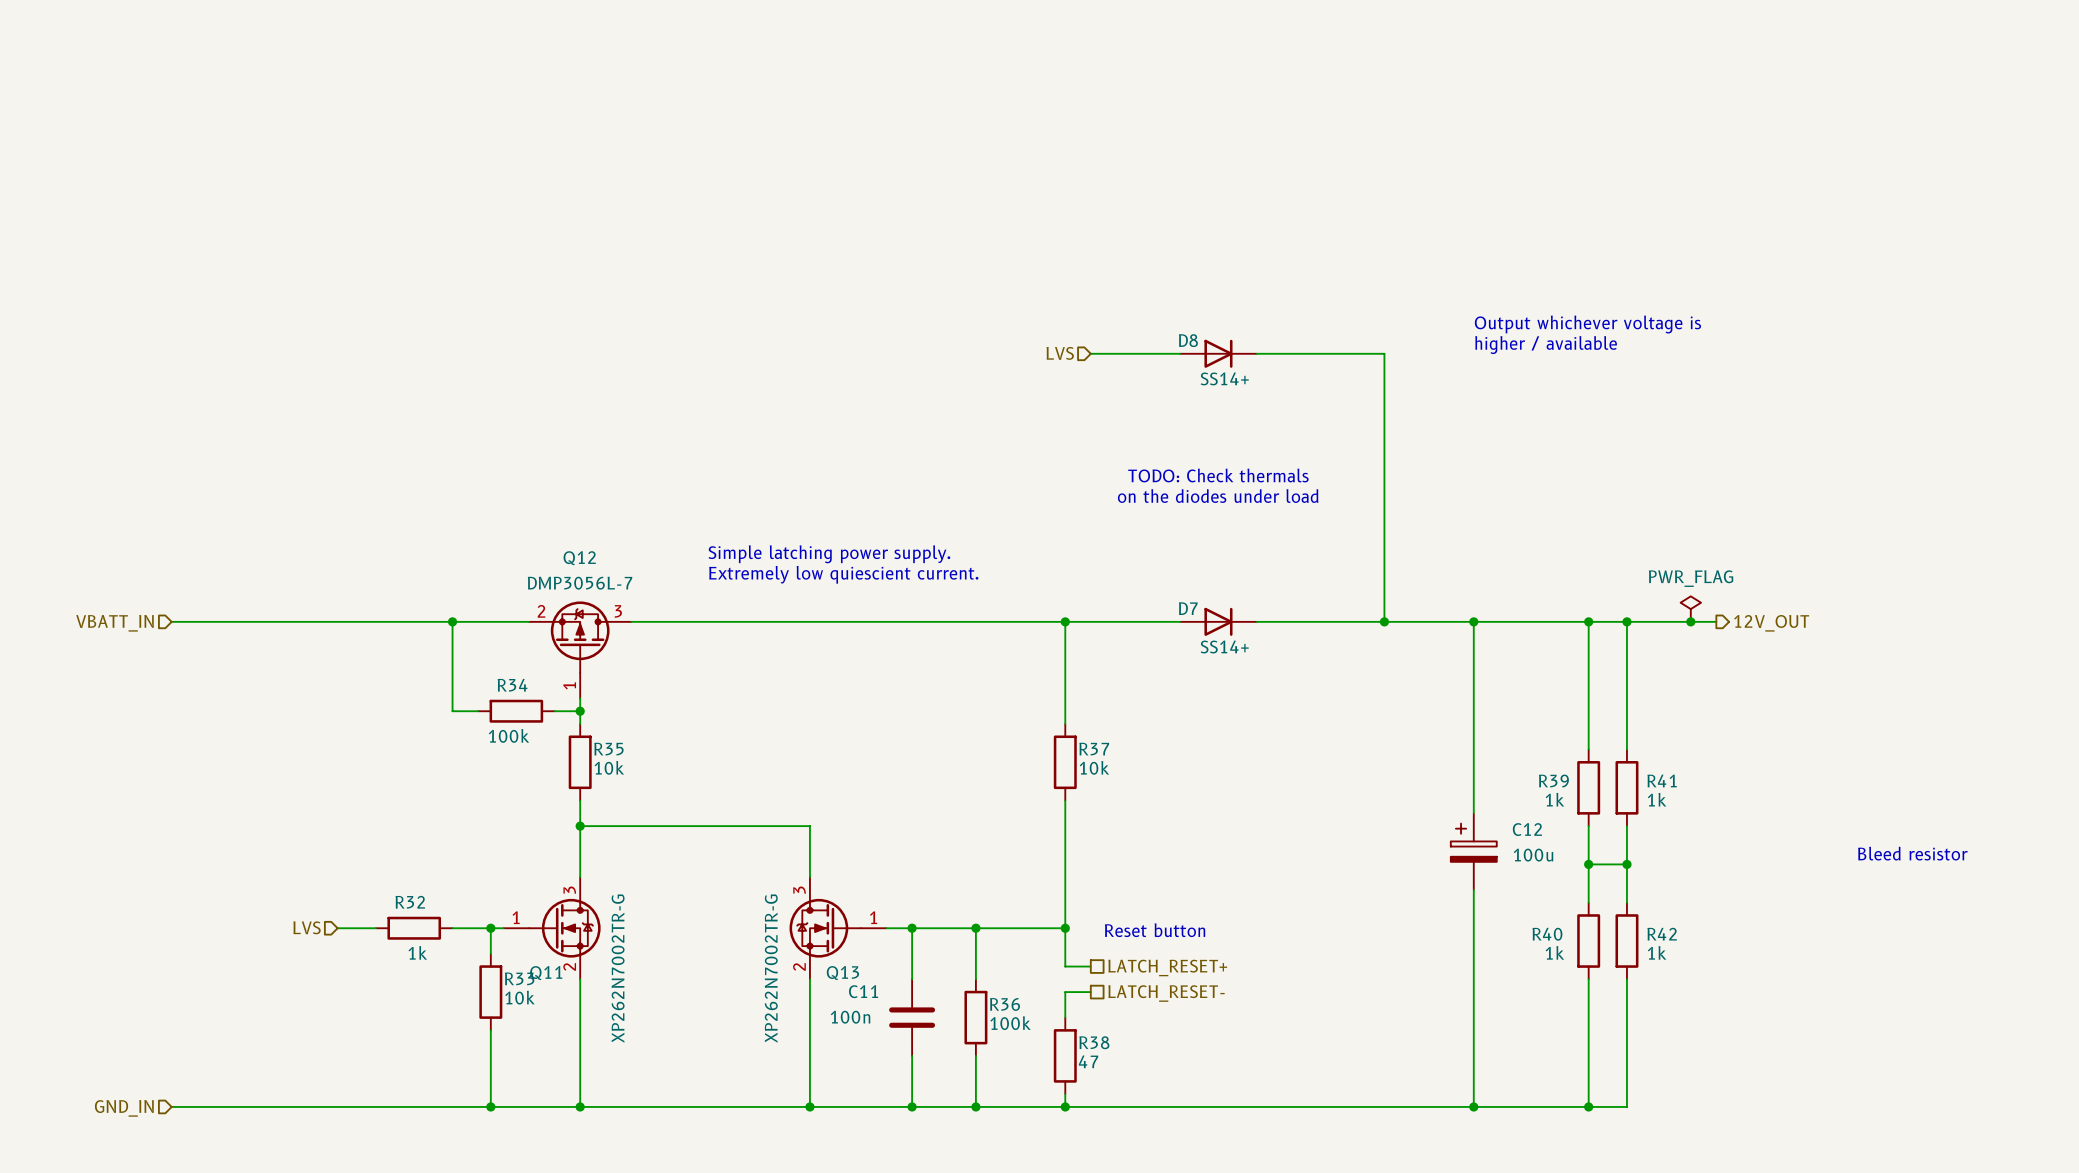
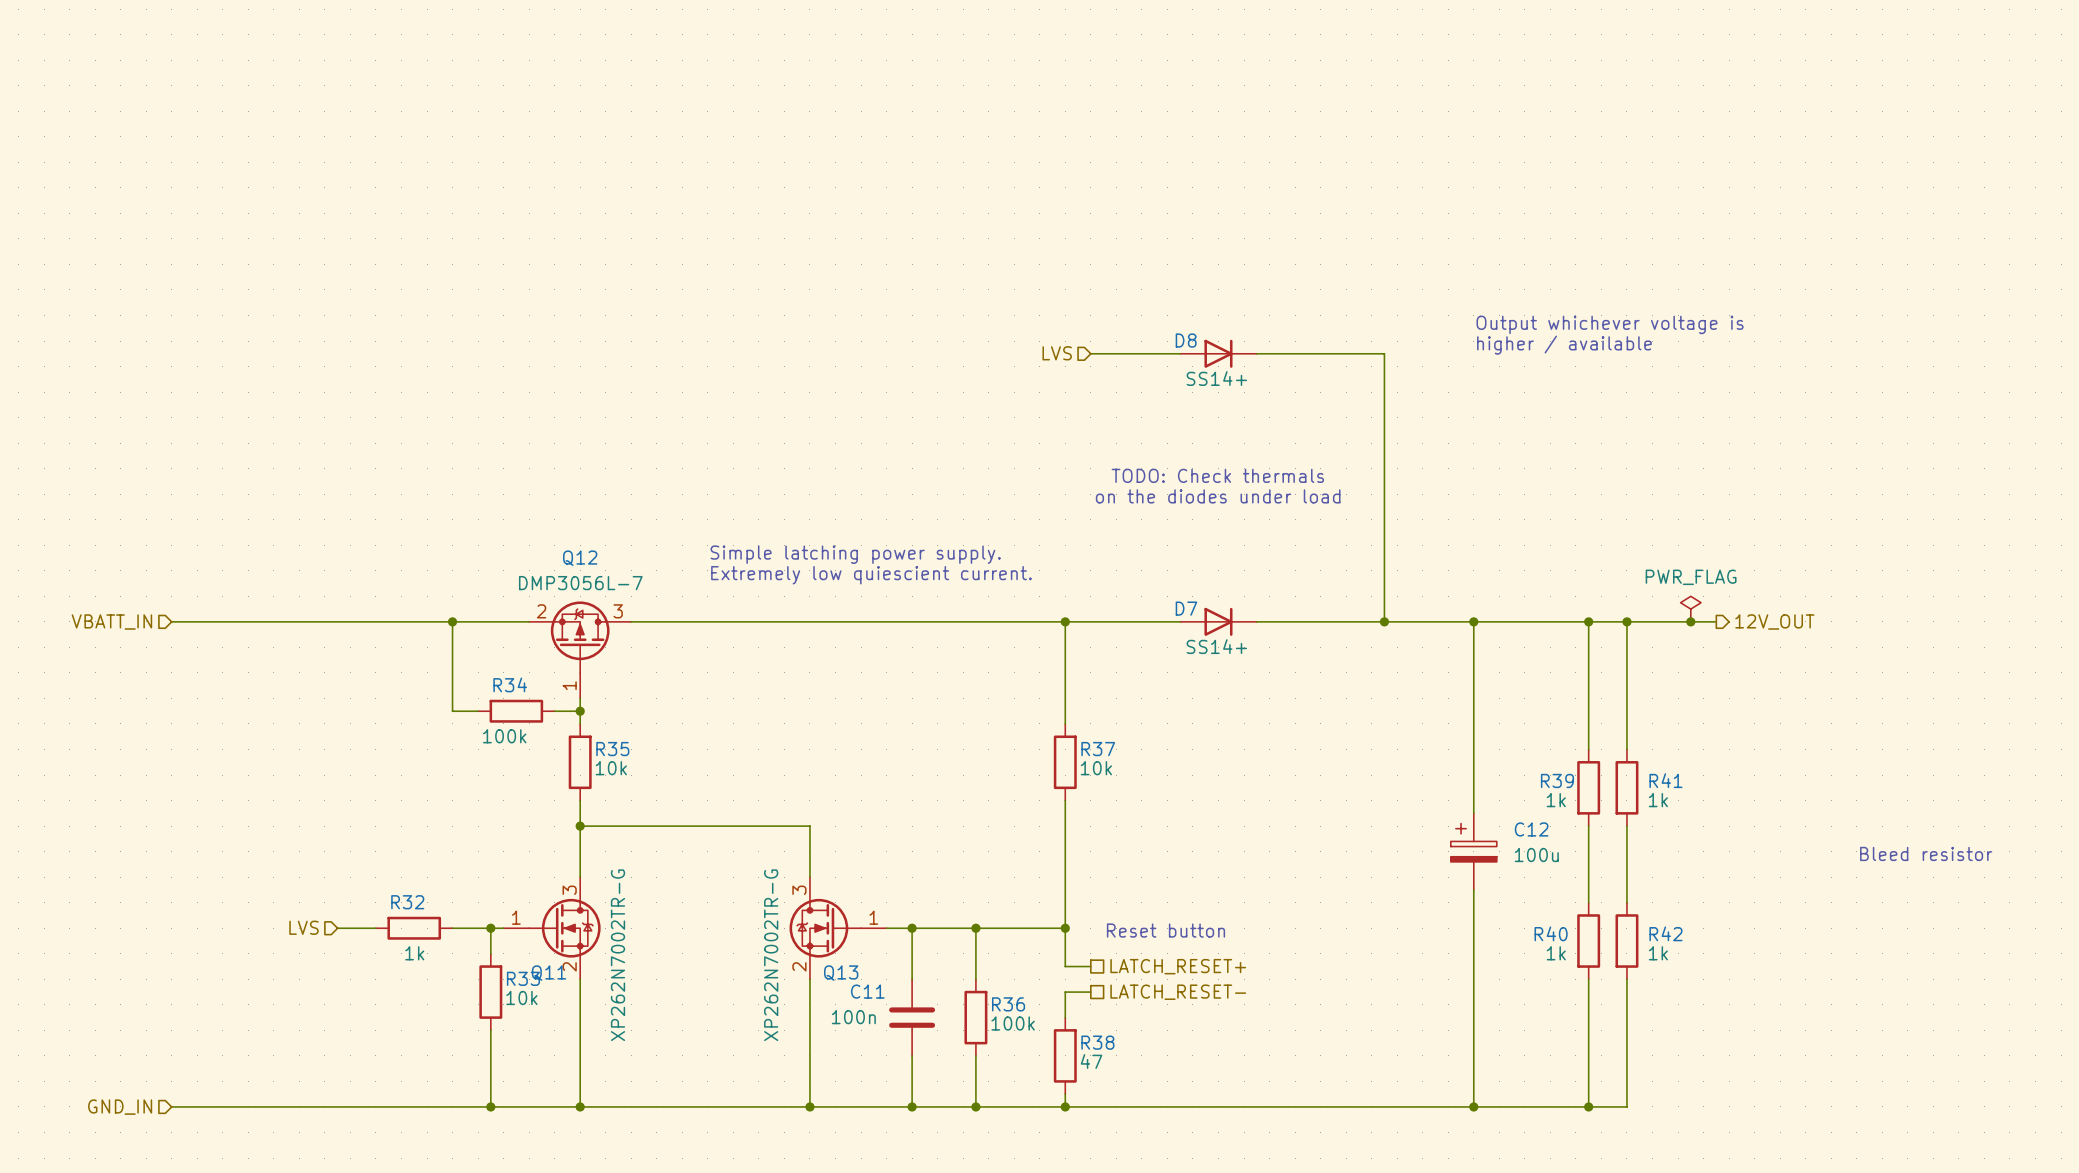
wire: (1588, 864) (1626, 864) -> none
junction: (1588, 864) -> none
junction: (1626, 864) -> none

